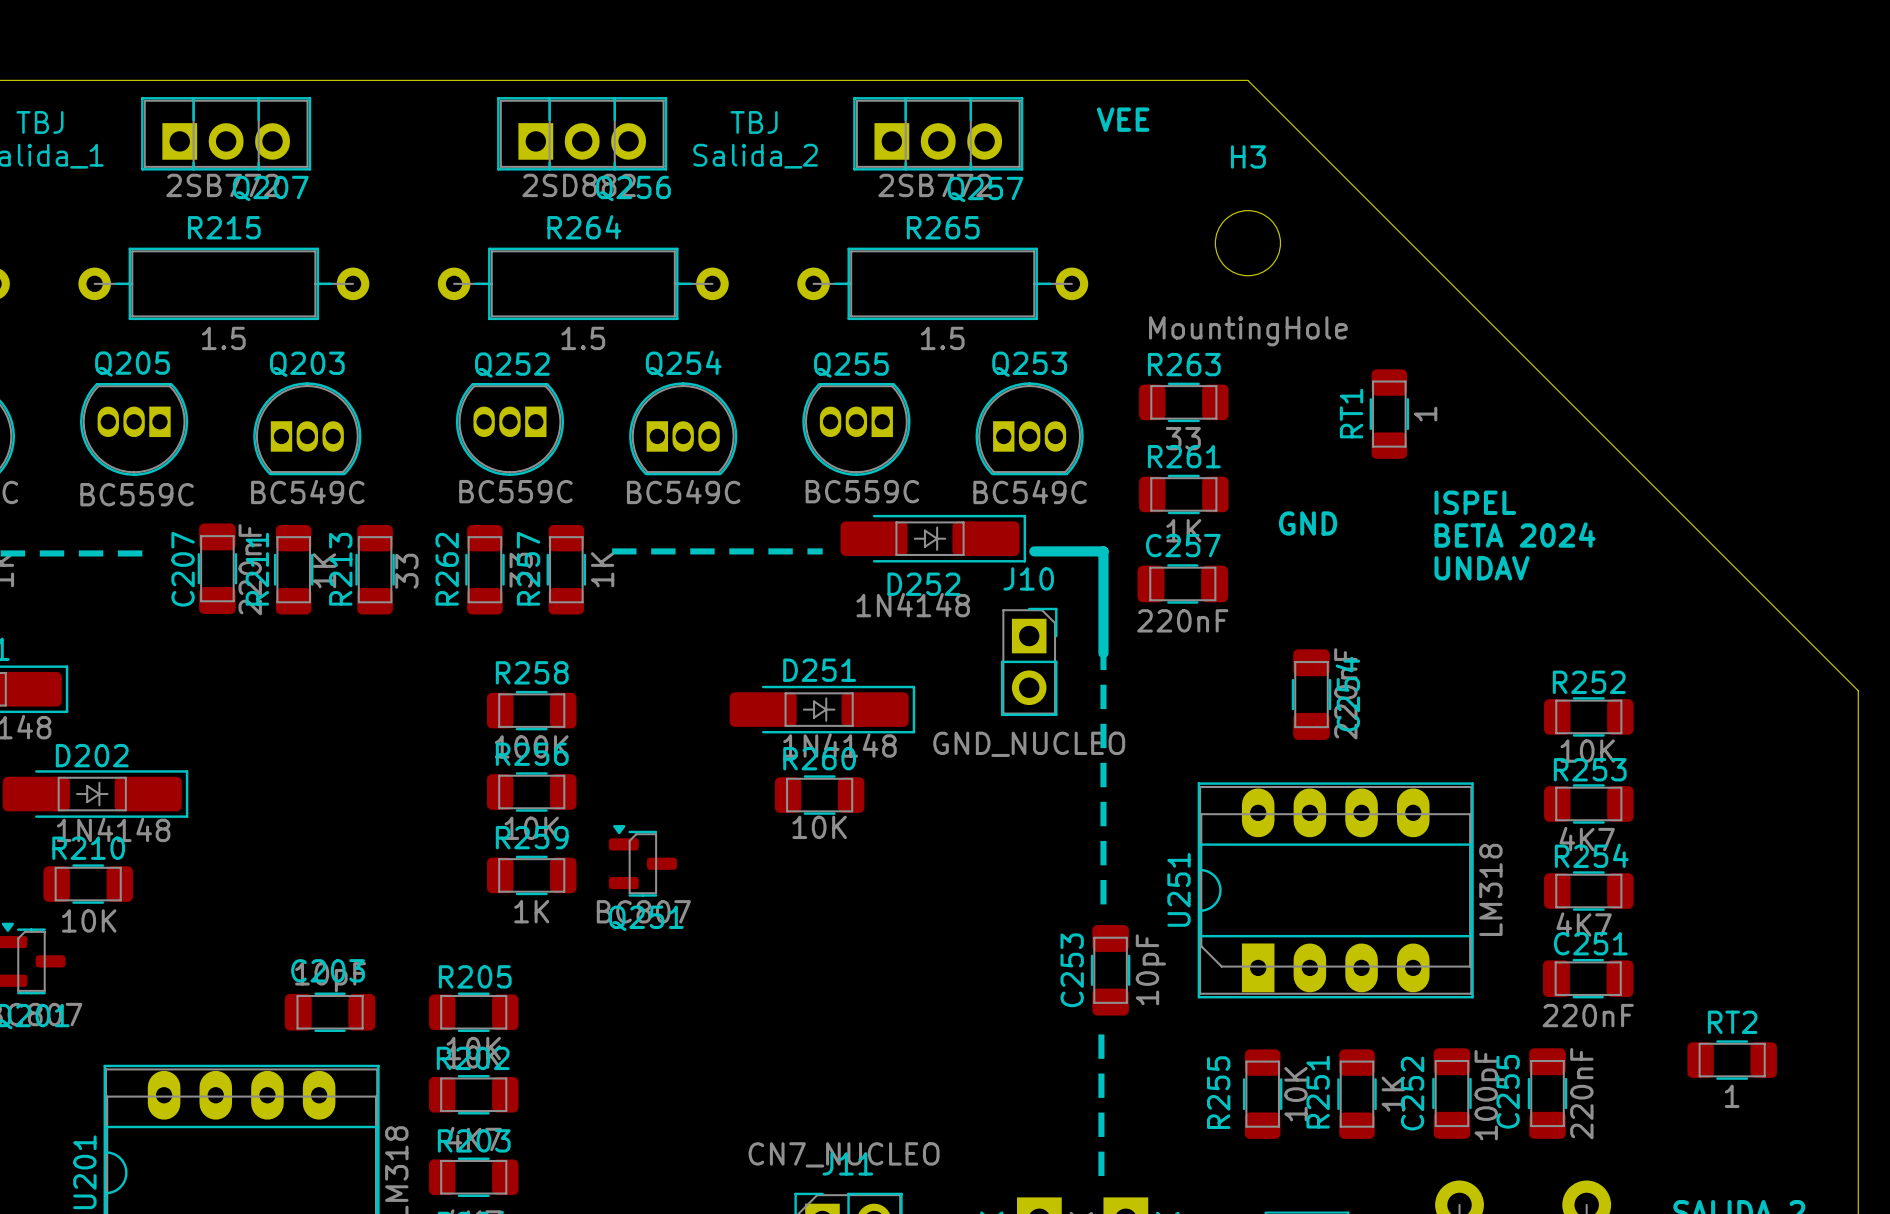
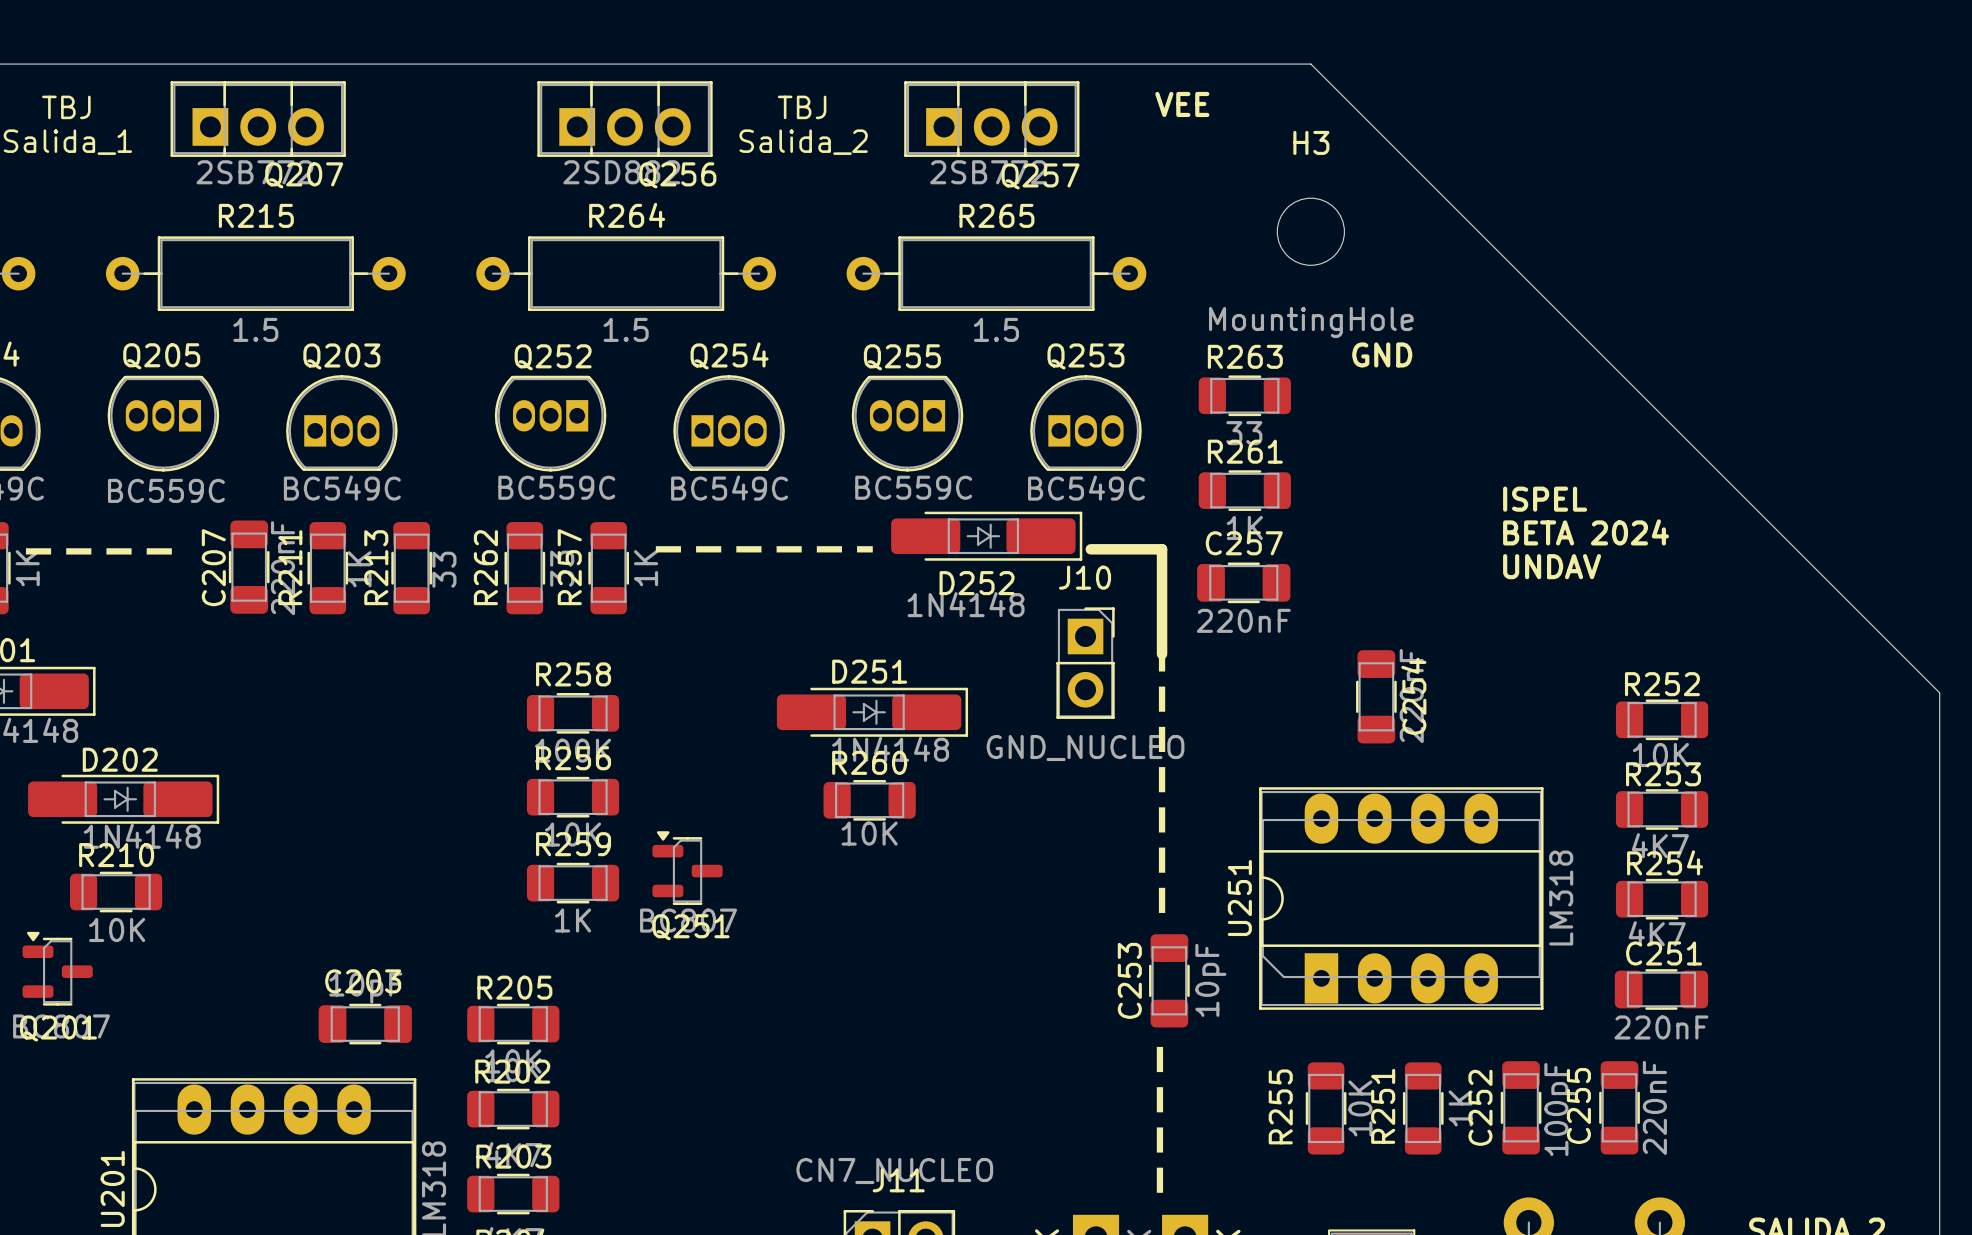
RT1: 1 (1389, 414) -> none
text position: GND (1308, 523) -> GND (1382, 354)
RT2: 1 (1732, 1060) -> none

